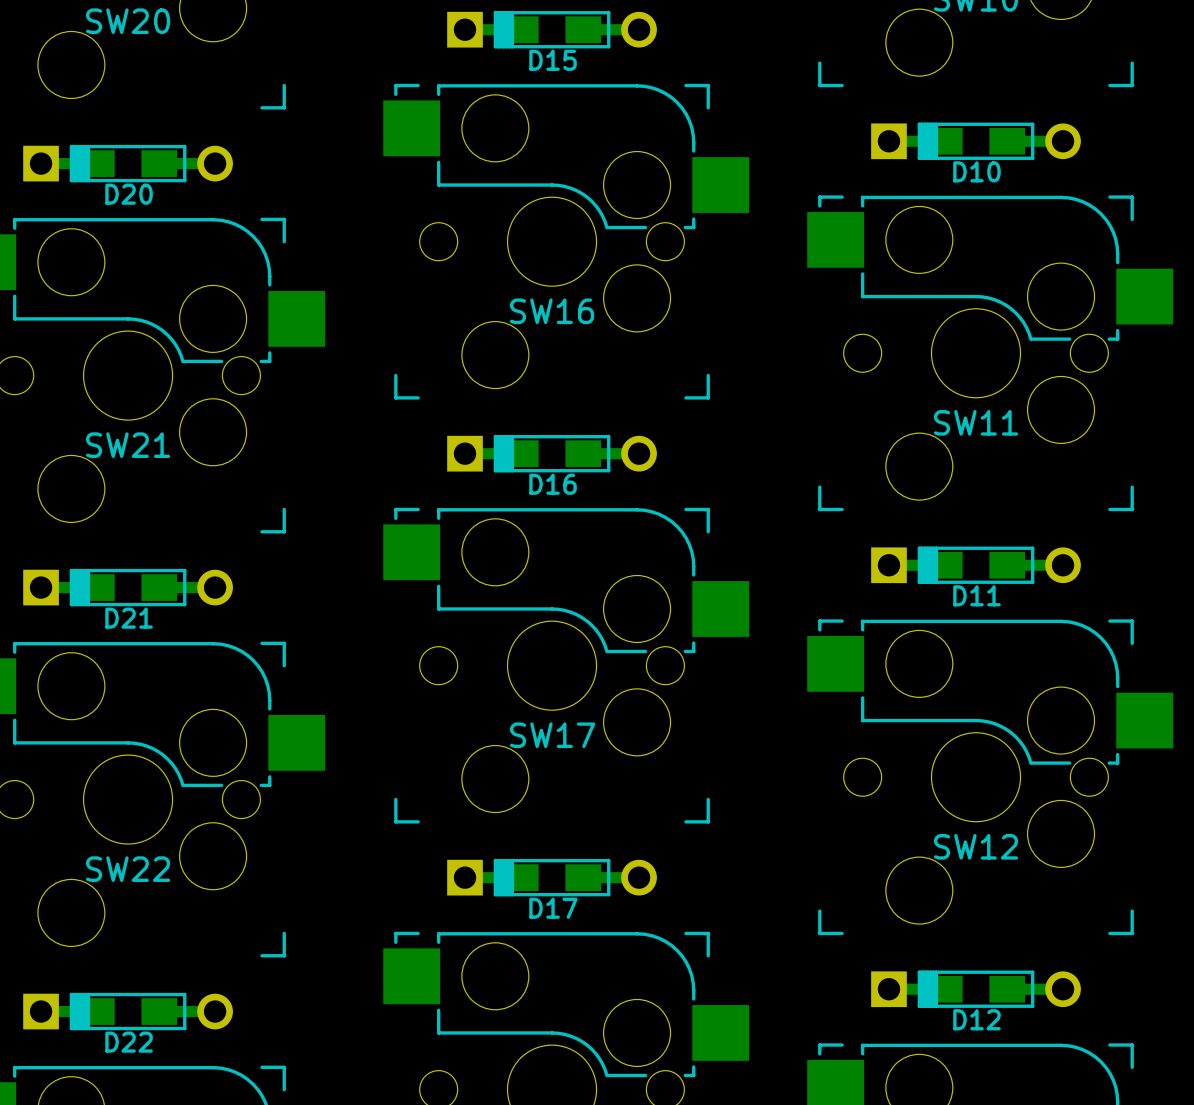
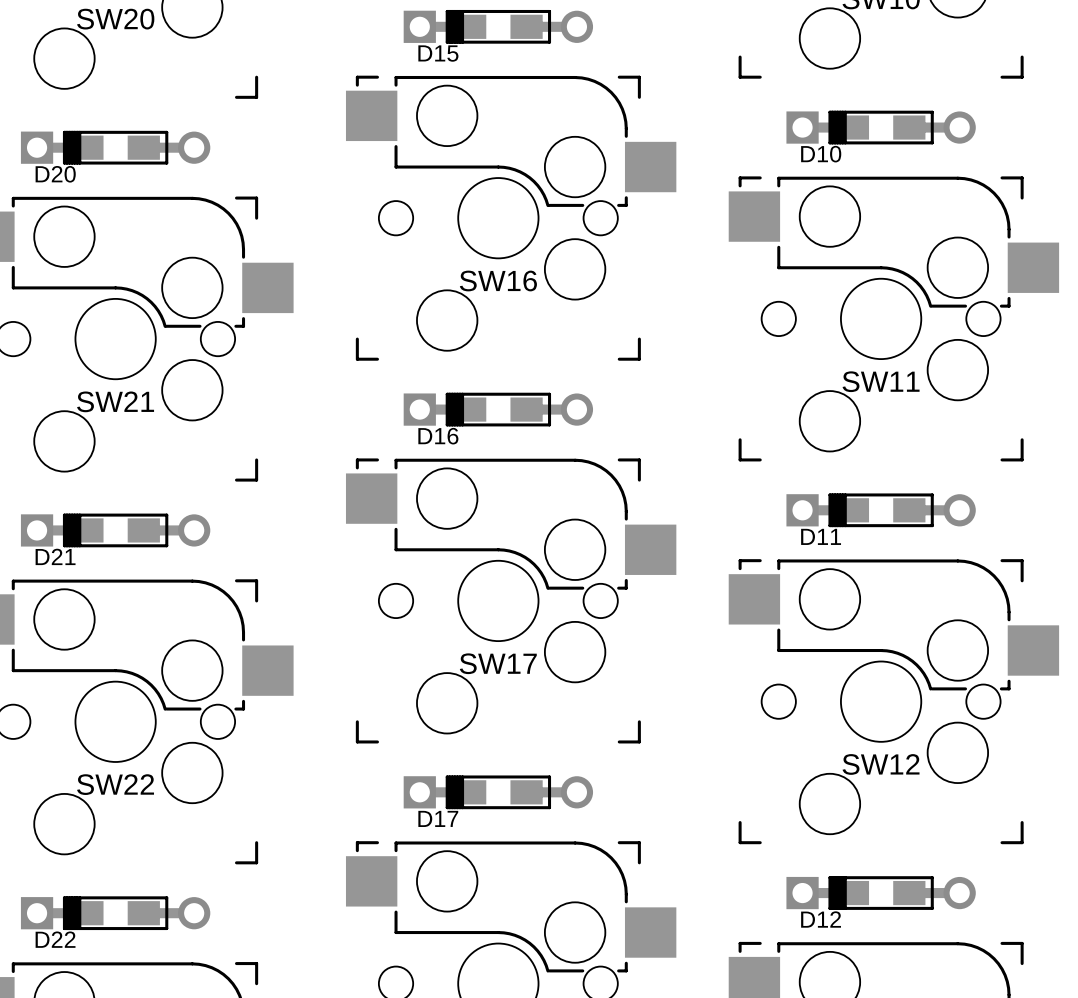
D15 name position: D15 (553, 60) -> D15 (438, 53)
D10 name position: D10 (977, 171) -> D10 (821, 154)
D20 name position: D20 (129, 194) -> D20 (55, 174)
D16 name position: D16 (553, 484) -> D16 (438, 436)
D11 name position: D11 (977, 595) -> D11 (821, 536)
D21 name position: D21 (129, 618) -> D21 (55, 556)
D17 name position: D17 (553, 908) -> D17 (438, 818)
D12 name position: D12 (977, 1019) -> D12 (821, 919)
D22 name position: D22 (129, 1042) -> D22 (55, 939)

